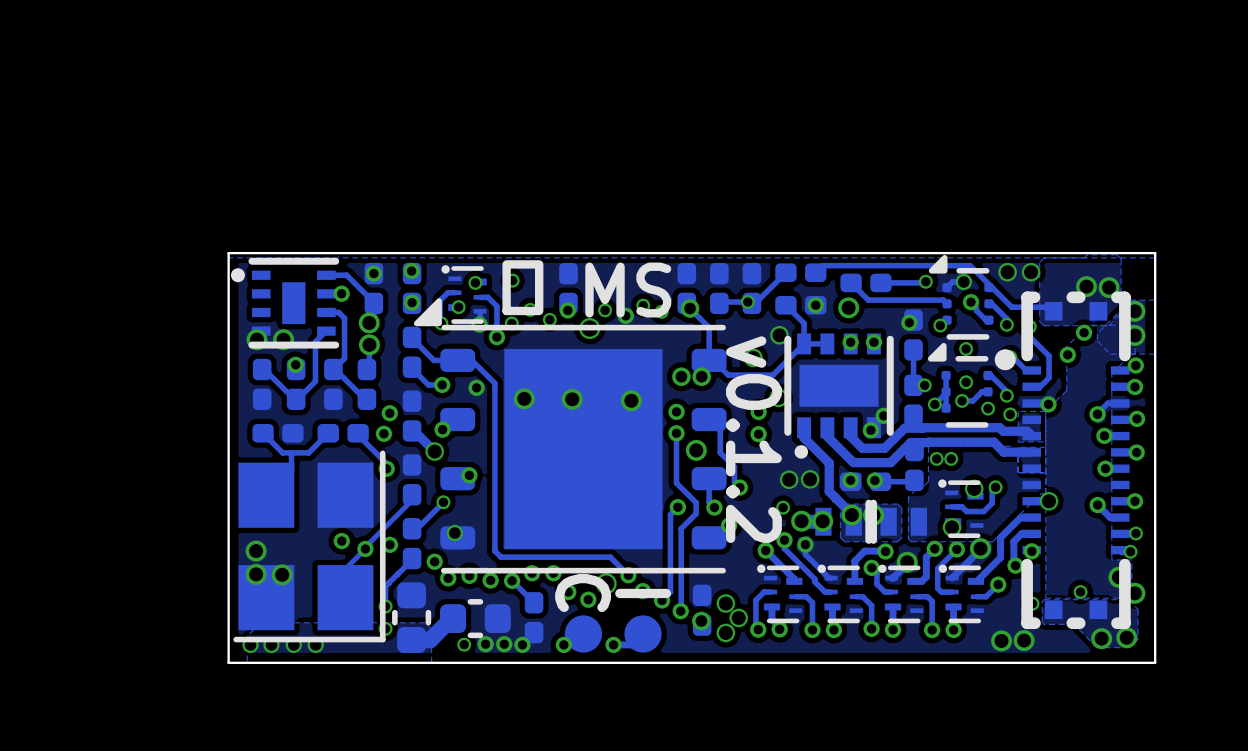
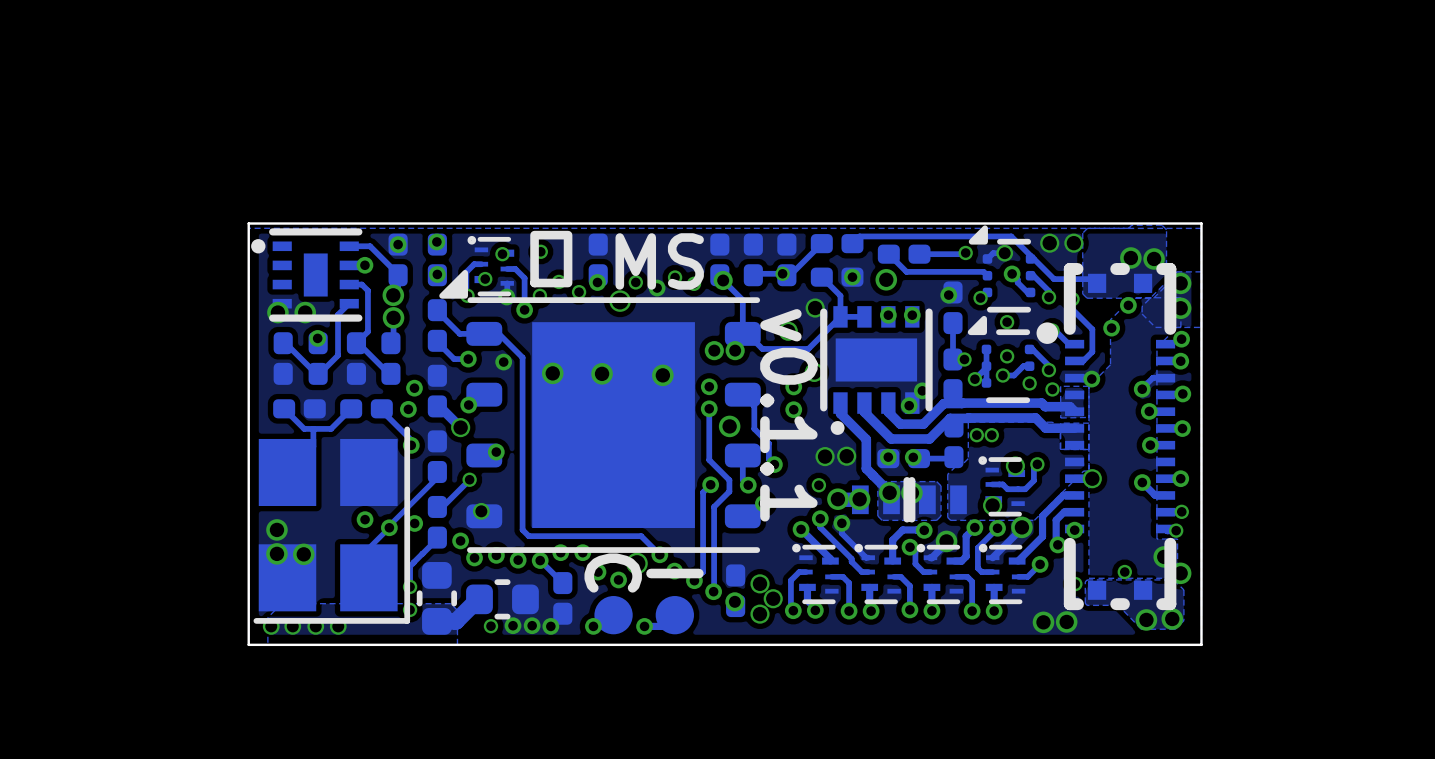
text: v0.1.2 (753, 439) -> v0.1.1 (788, 415)

